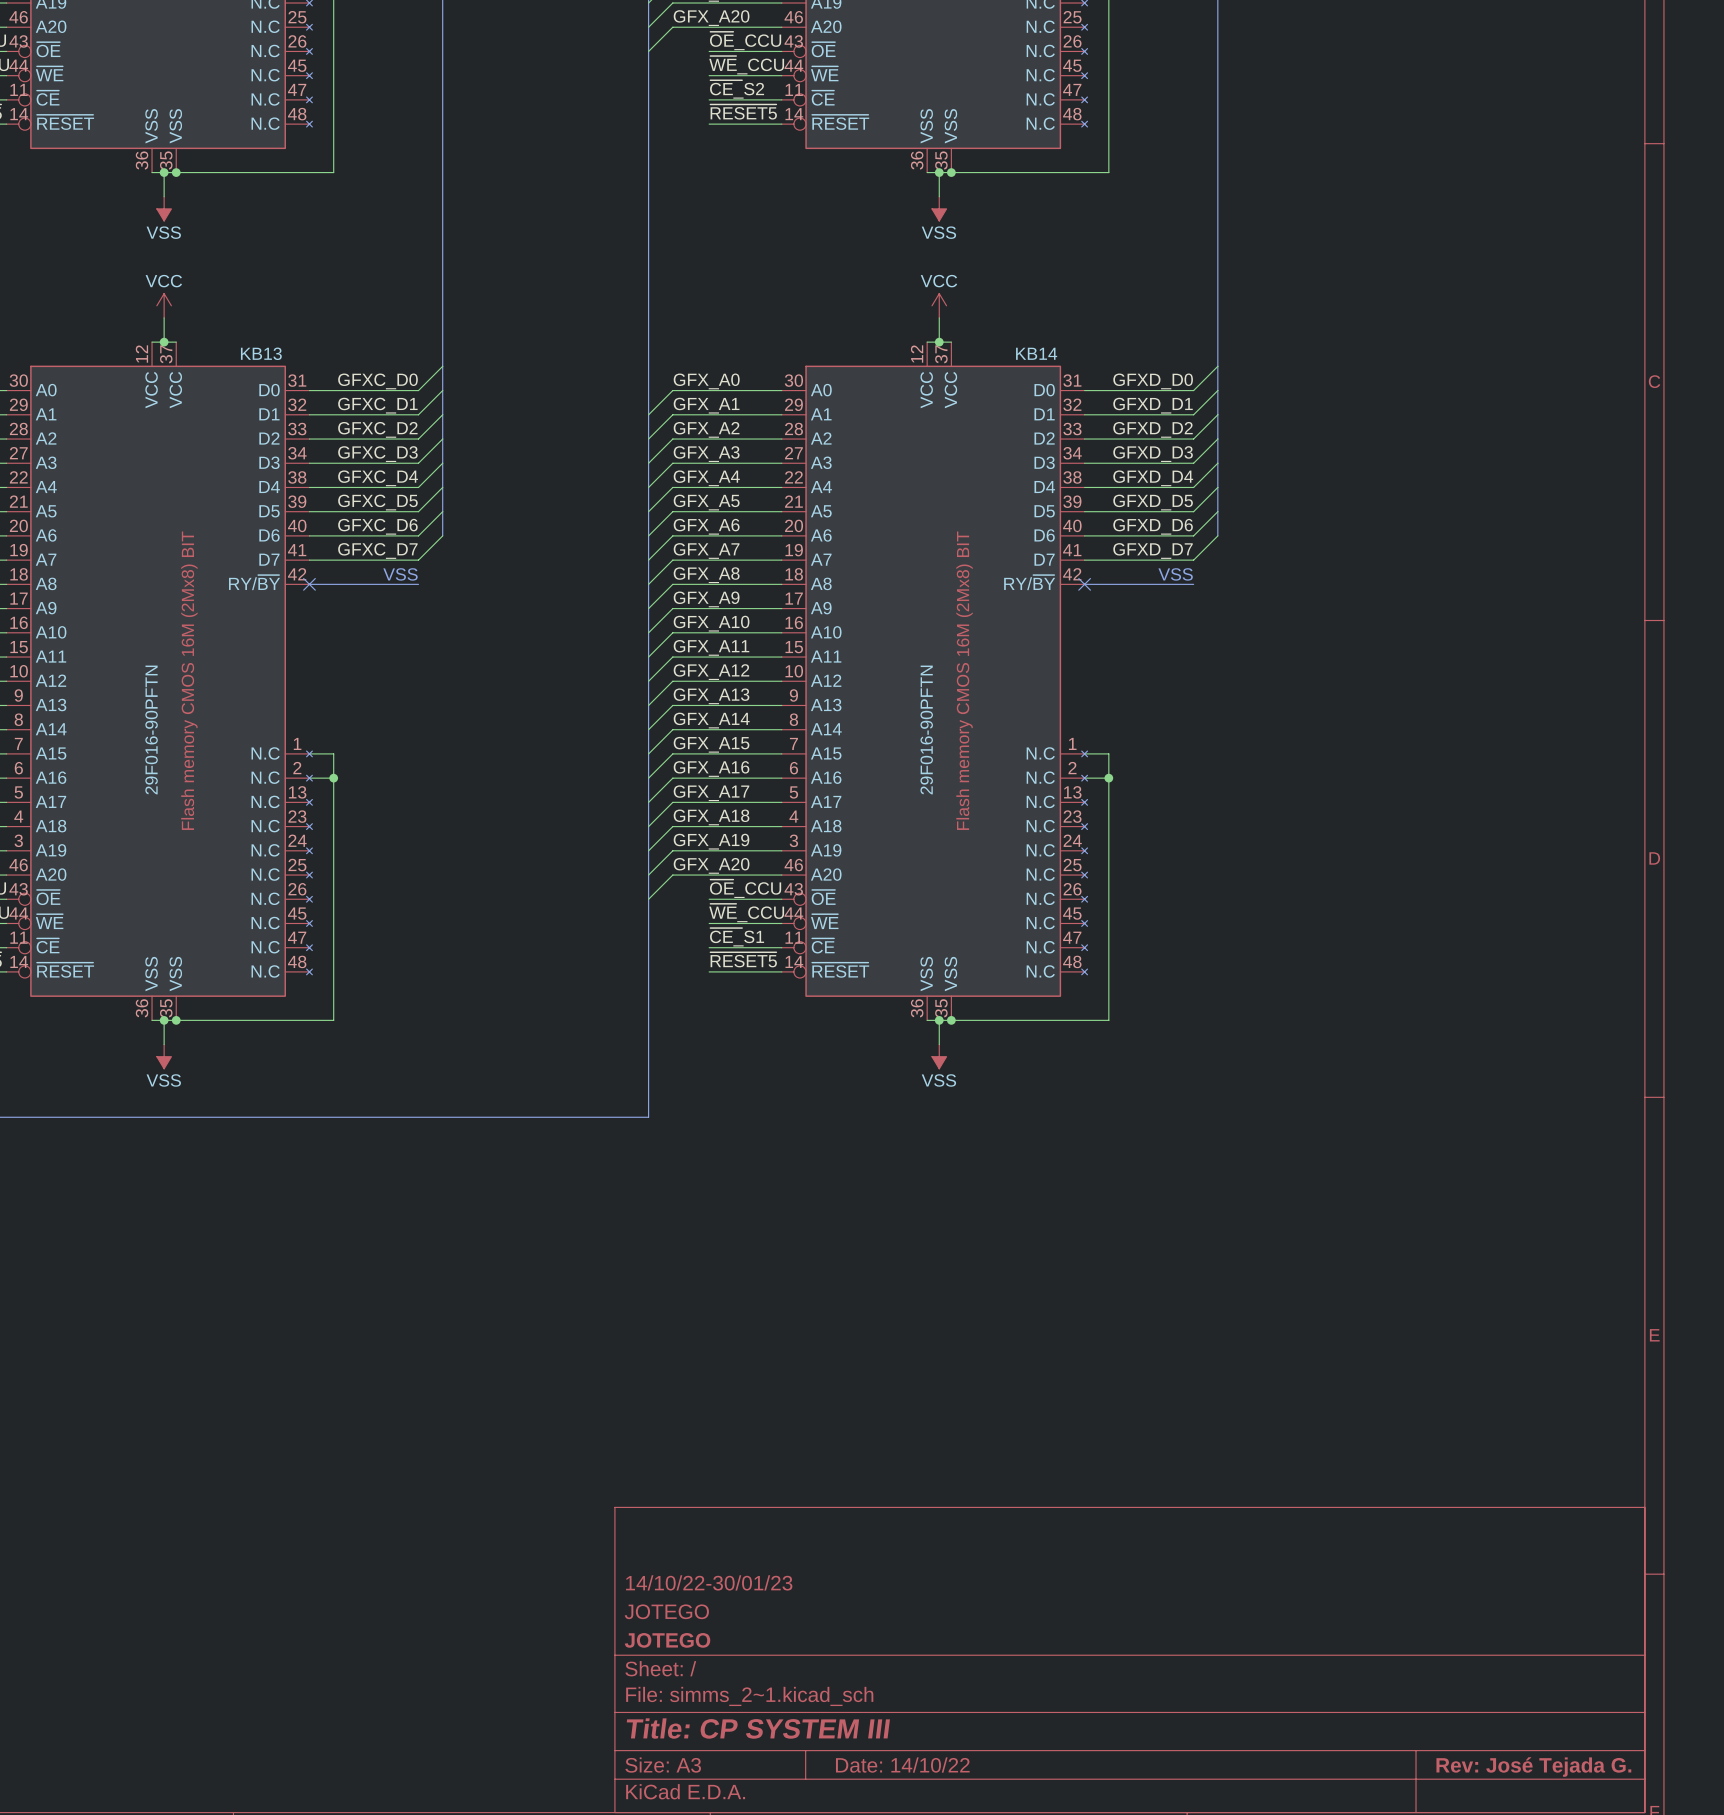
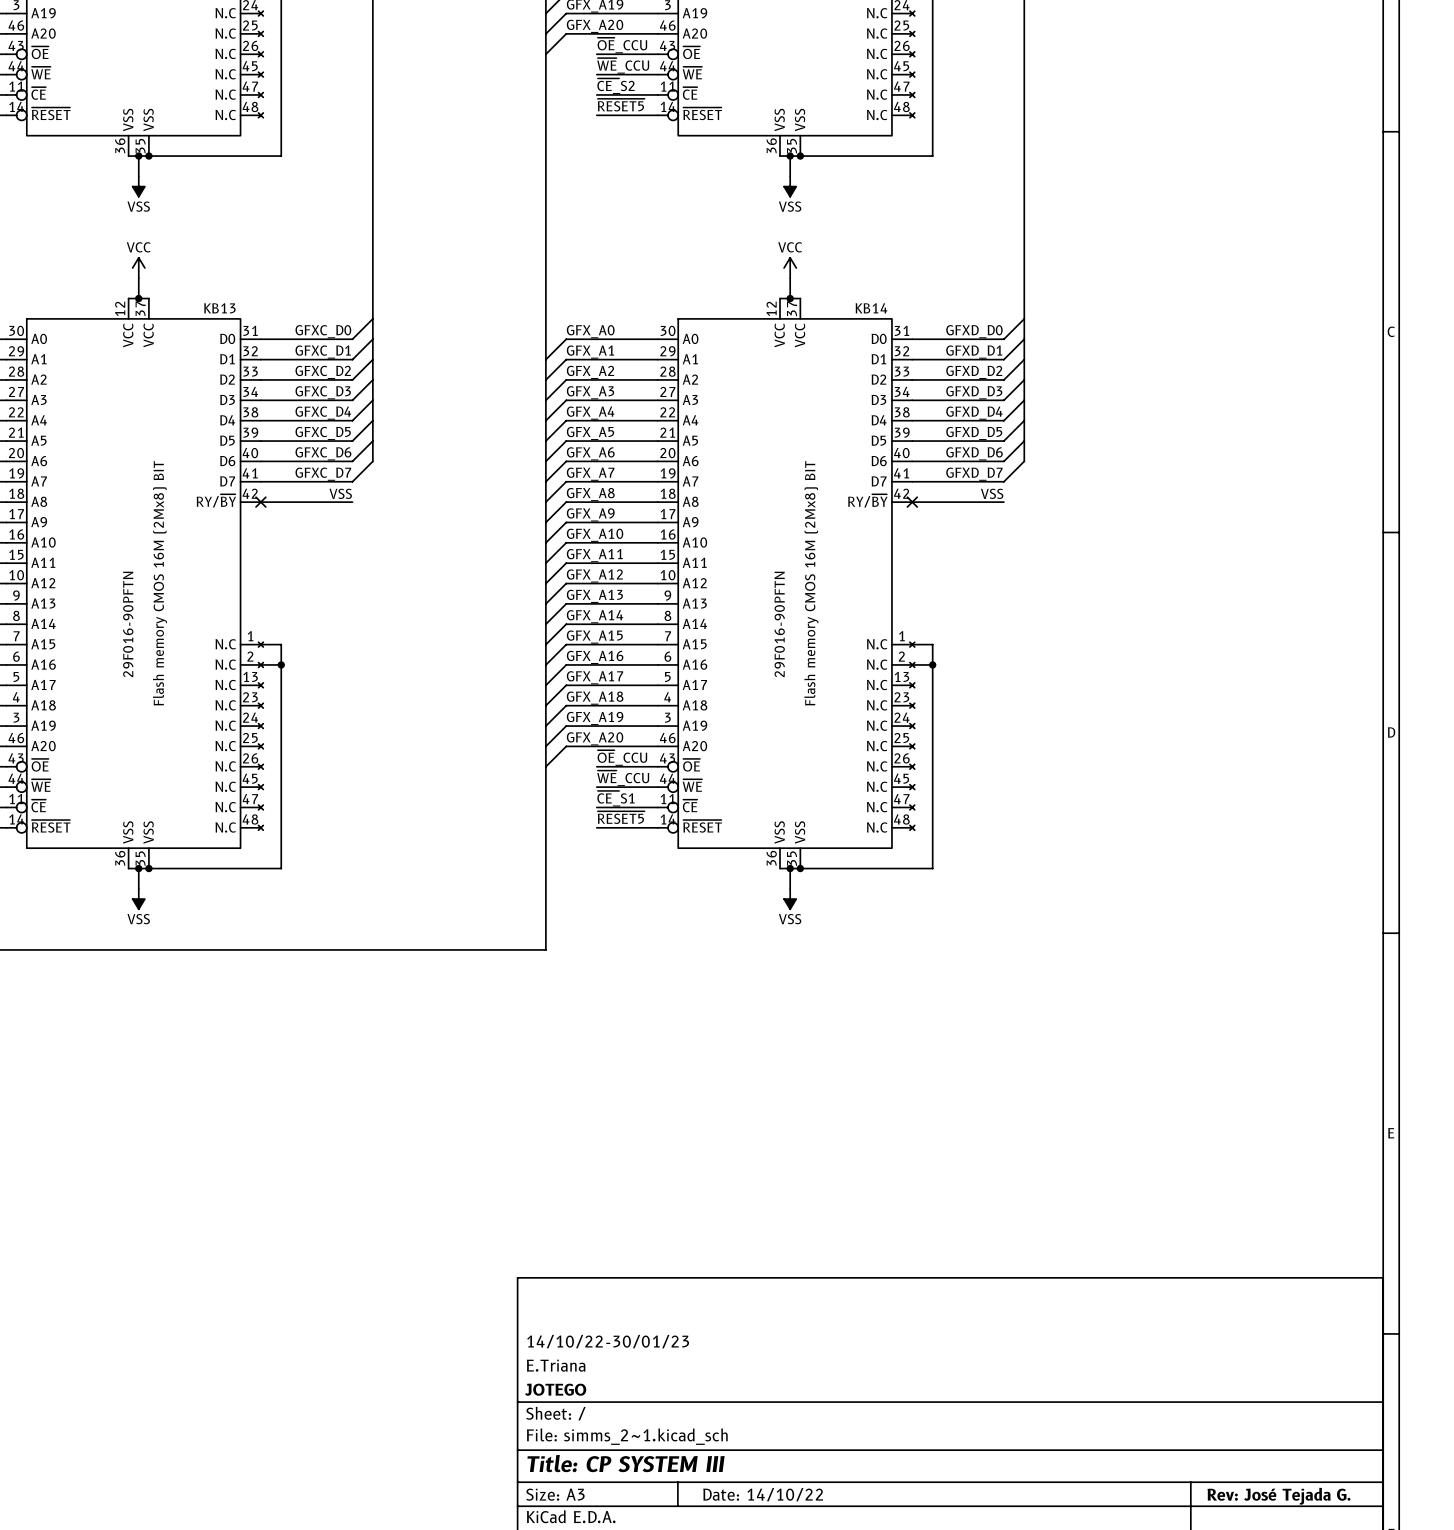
title block: JOTEGO (666, 1611) -> E.Triana (556, 1365)

